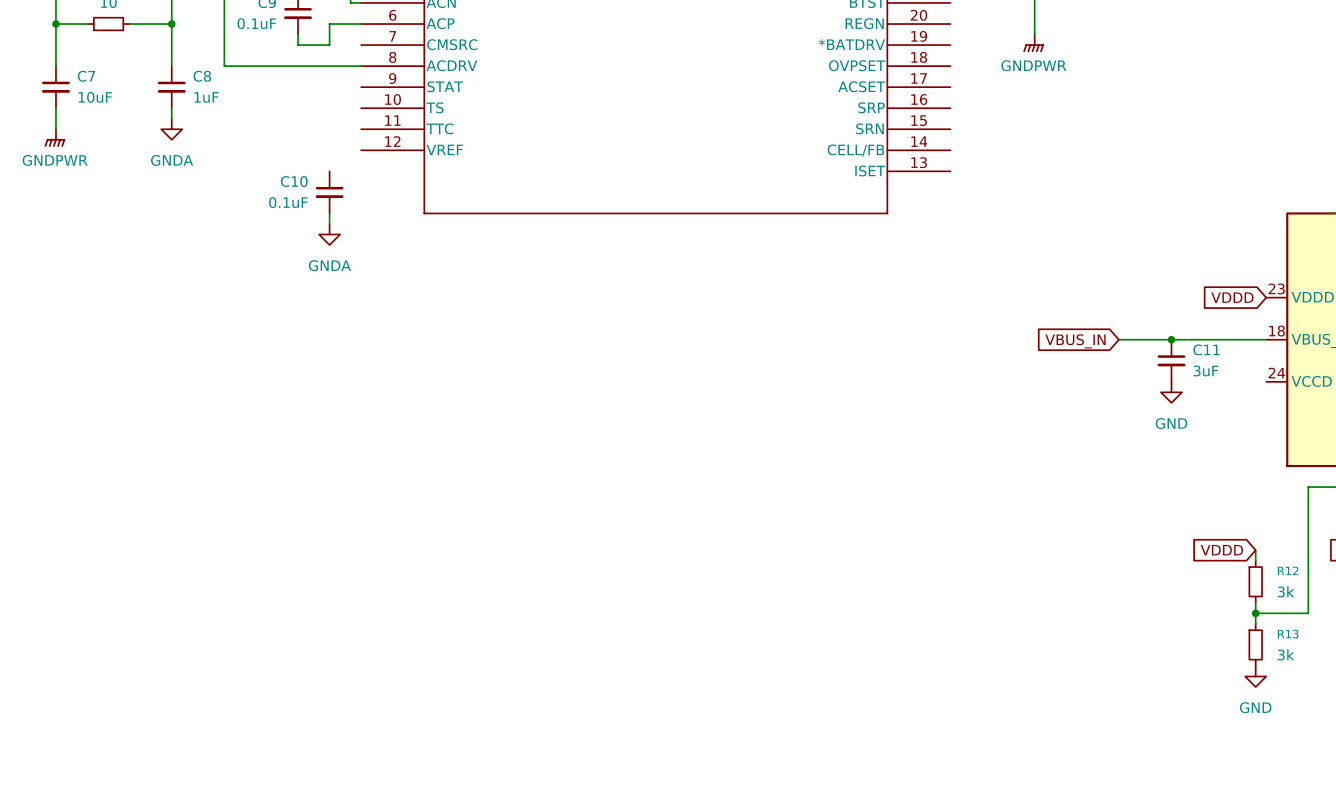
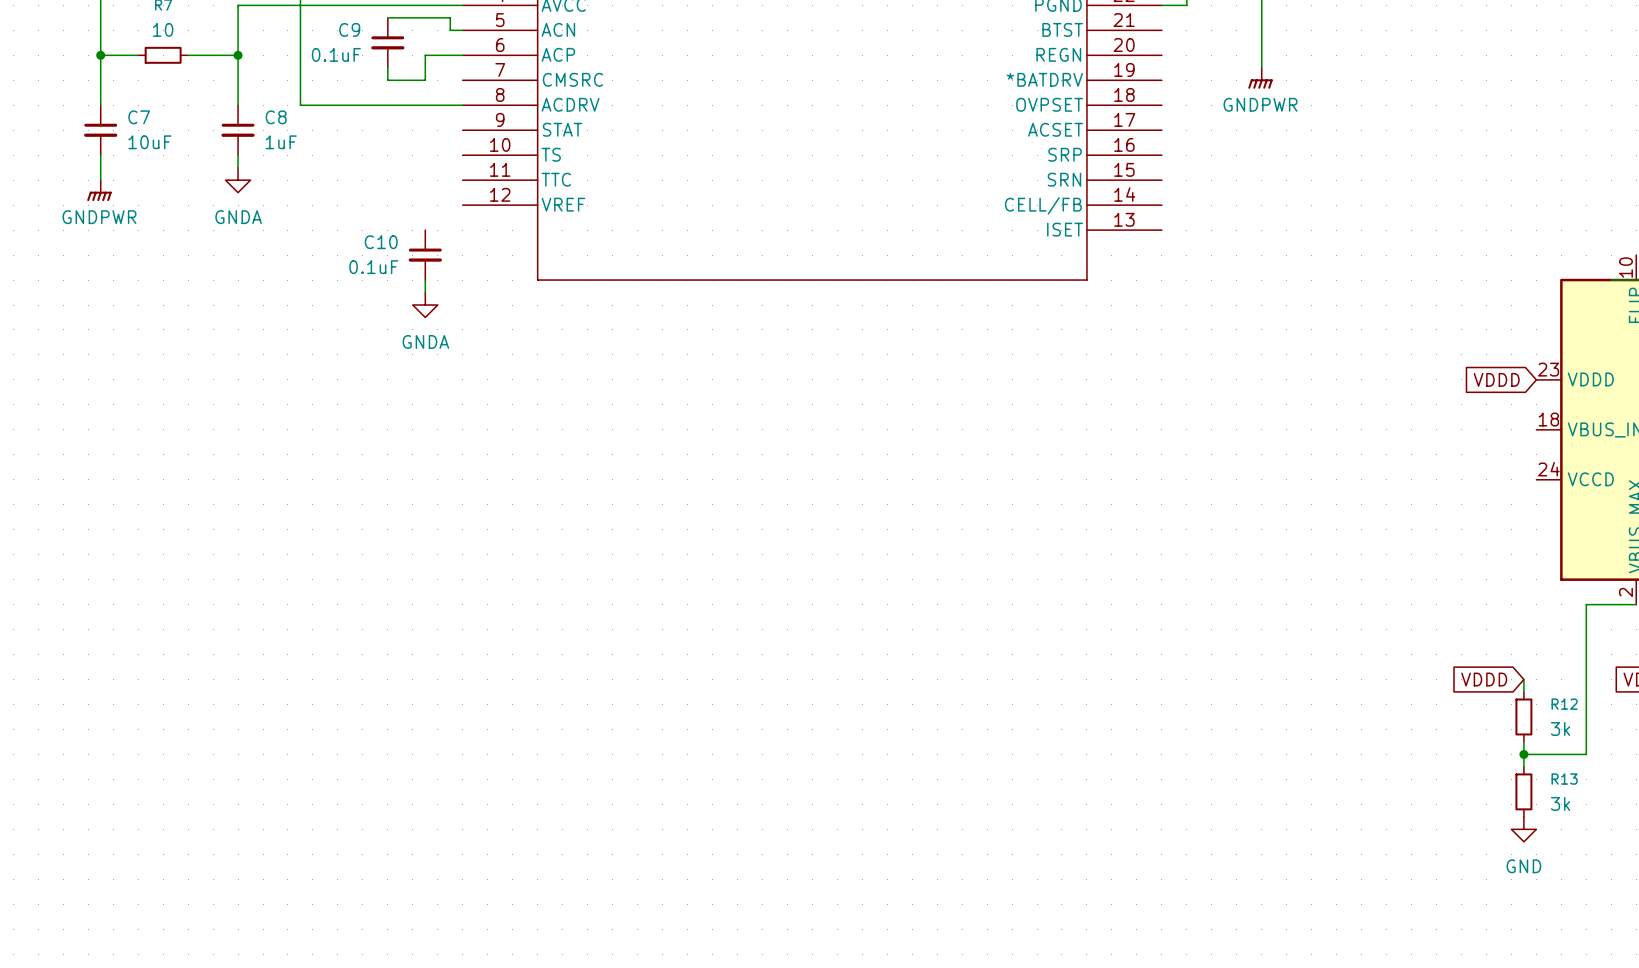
wire: (1118, 339) (1266, 339) -> none
junction: (1171, 339) -> none
global label: VBUS_IN (1075, 341) -> none
C11: 3uF (1171, 360) -> none
power symbol: GND (1171, 392) -> none

